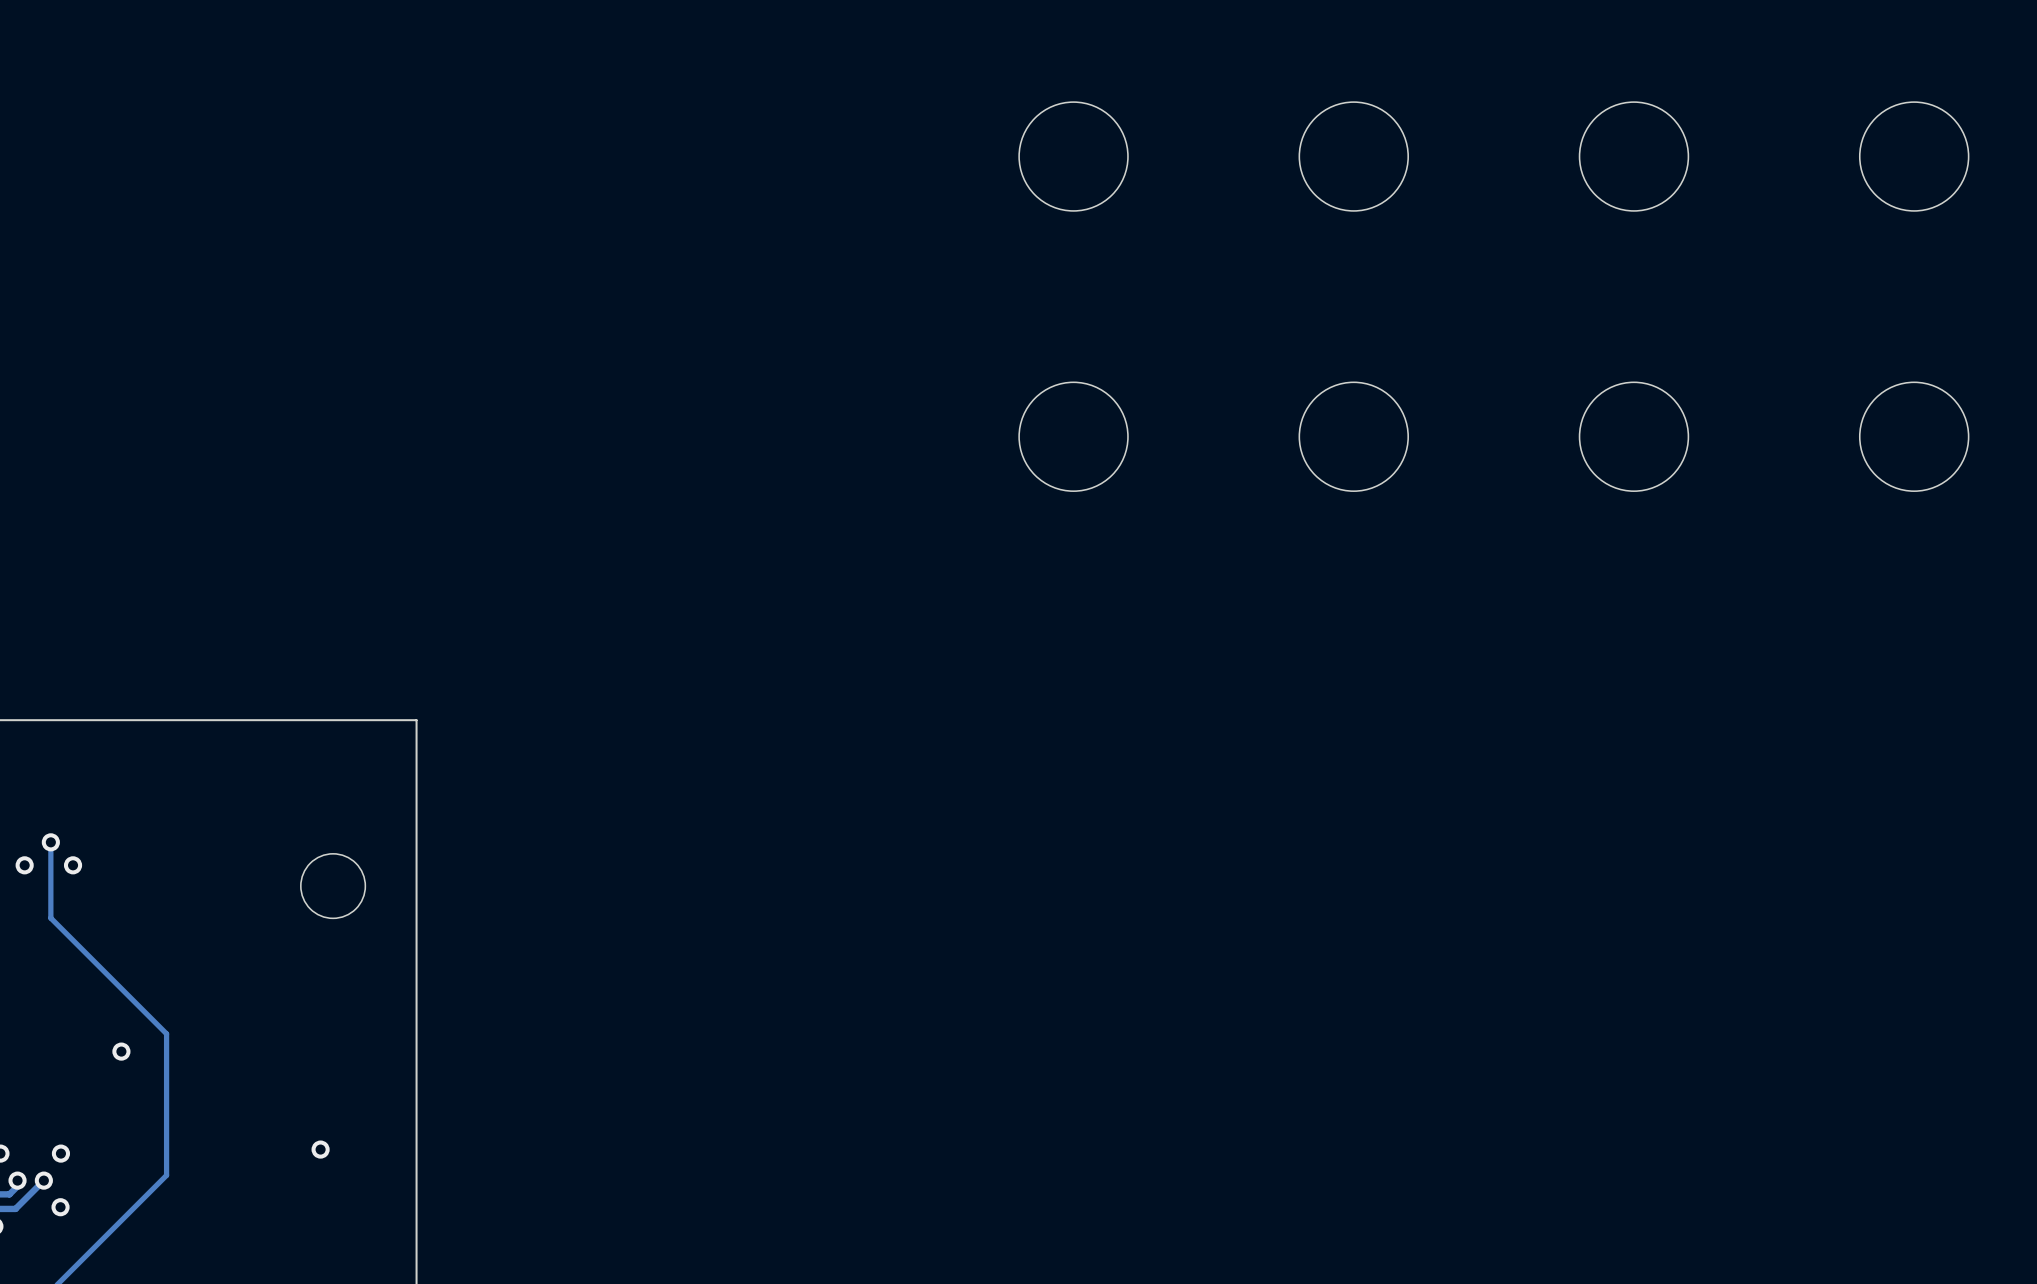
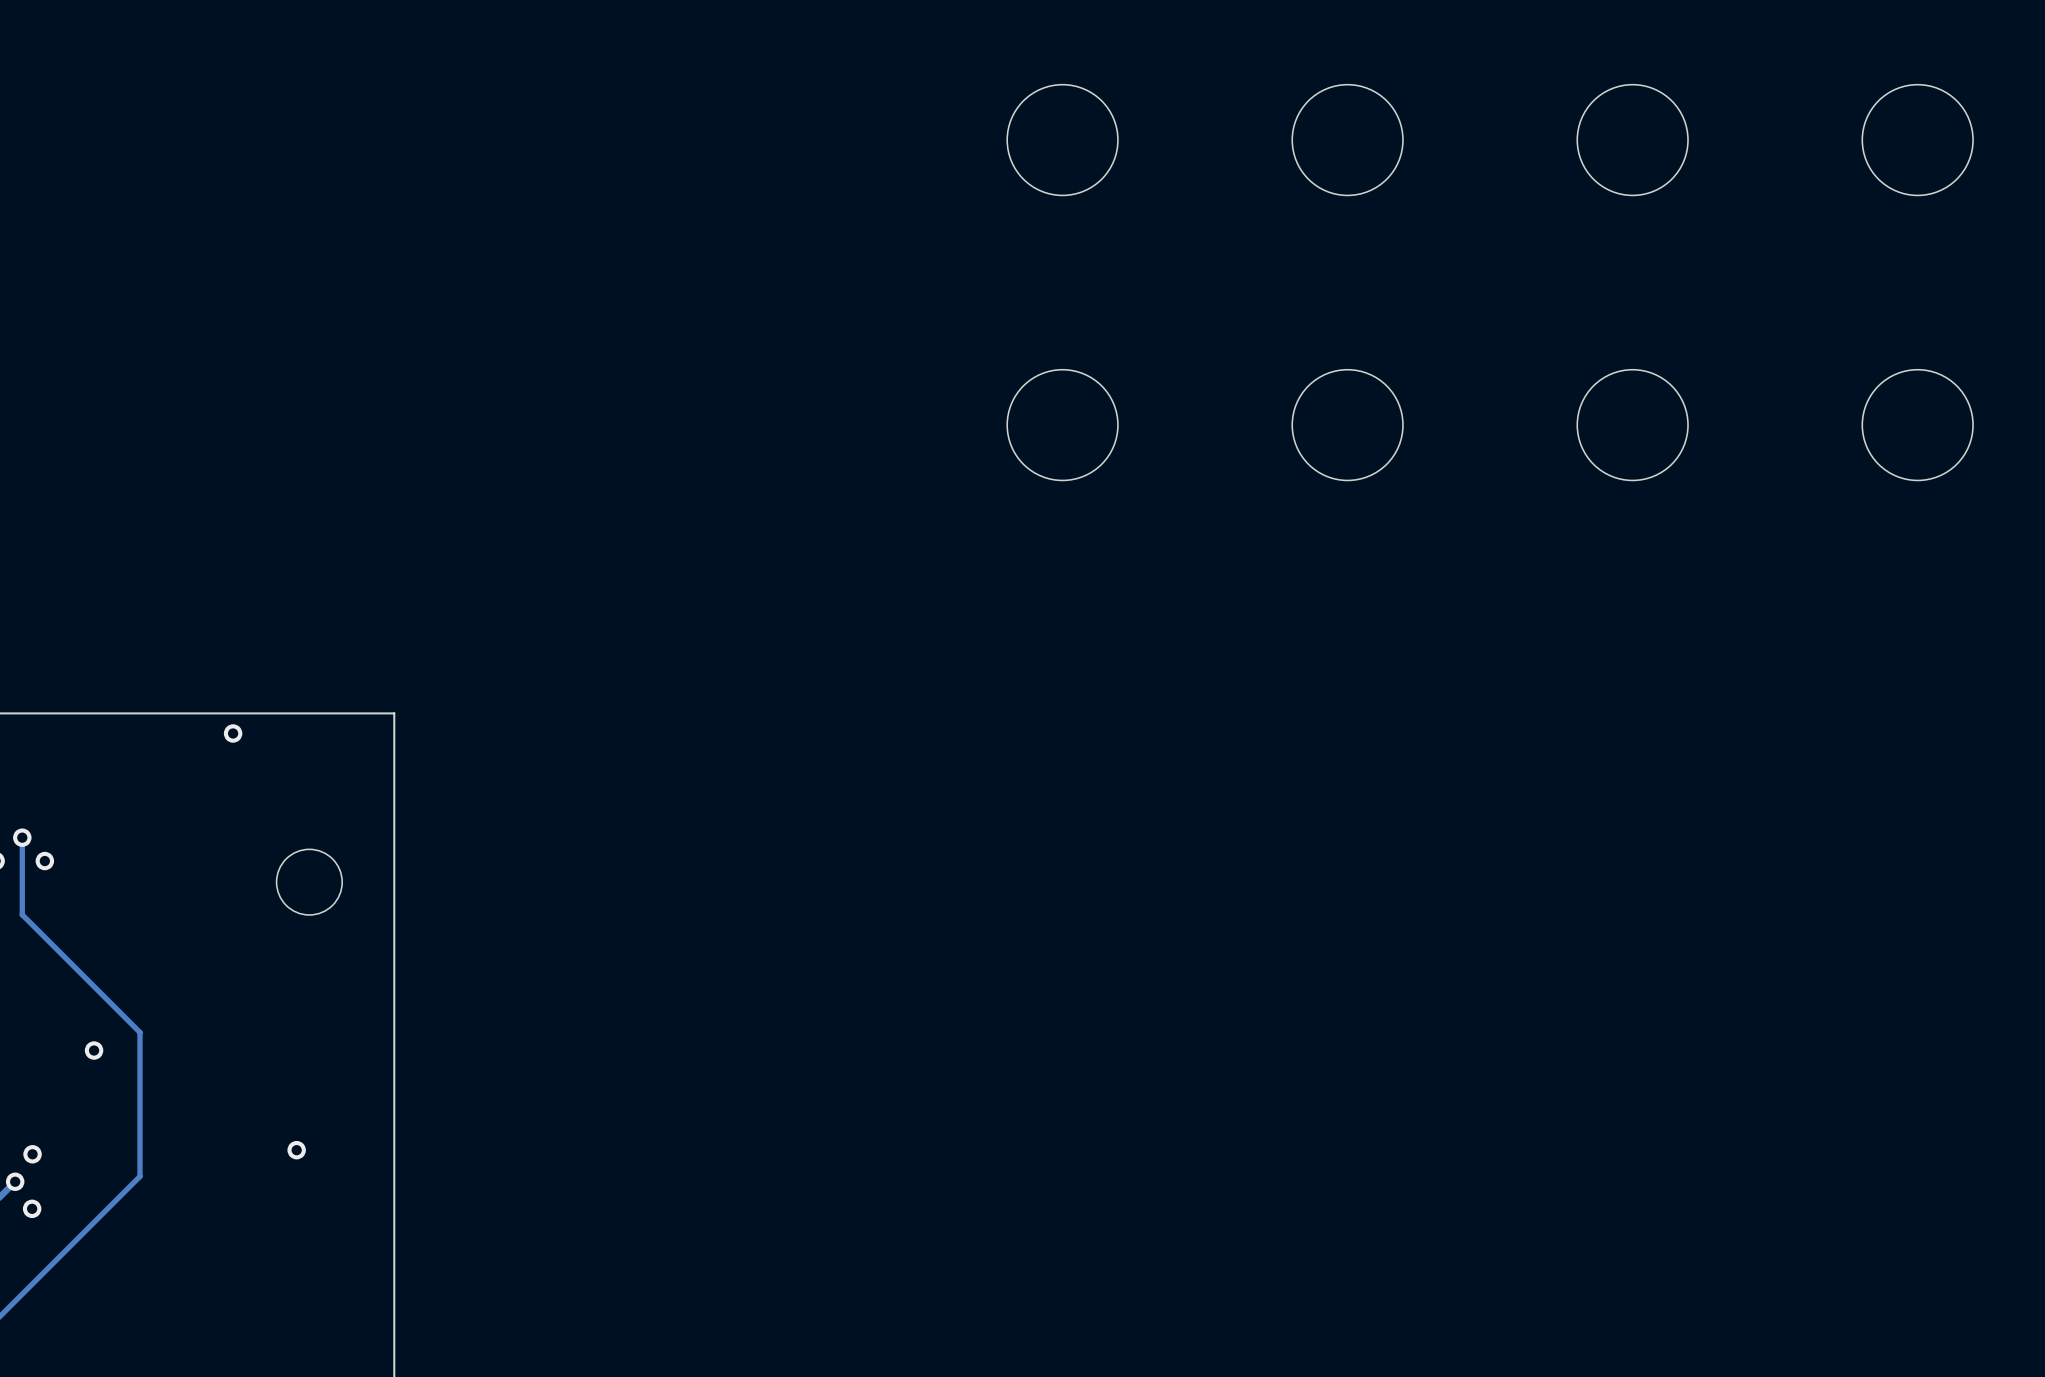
via: none -> (233, 733)

